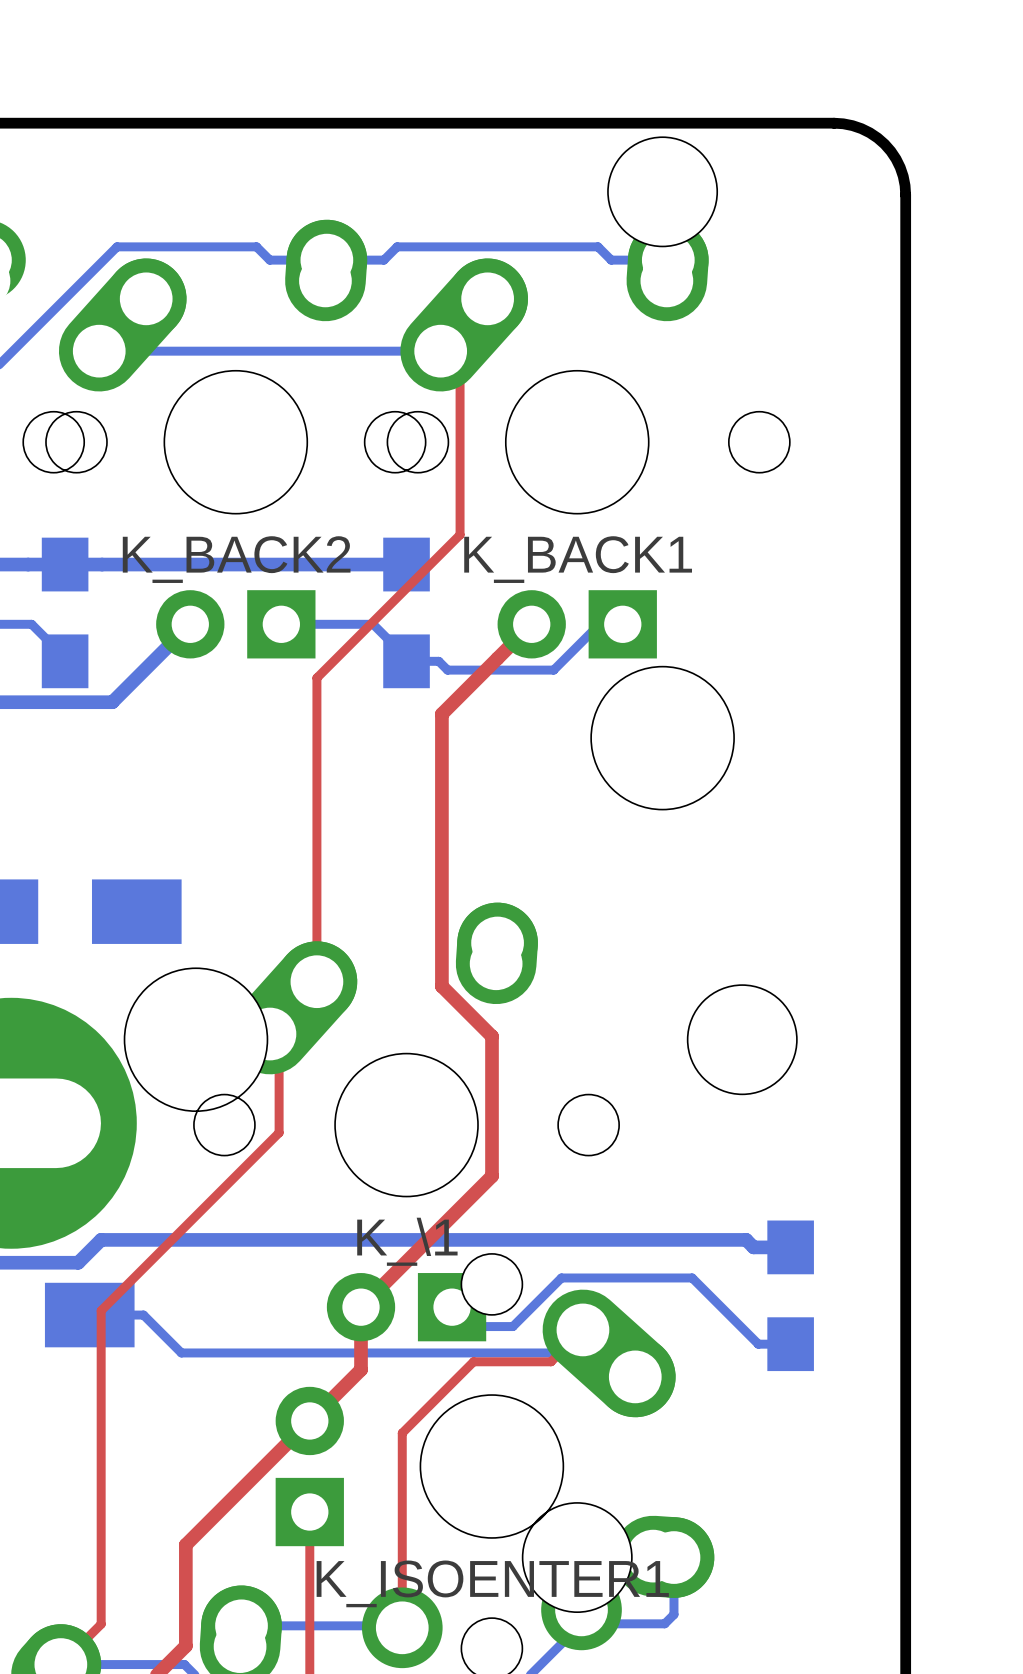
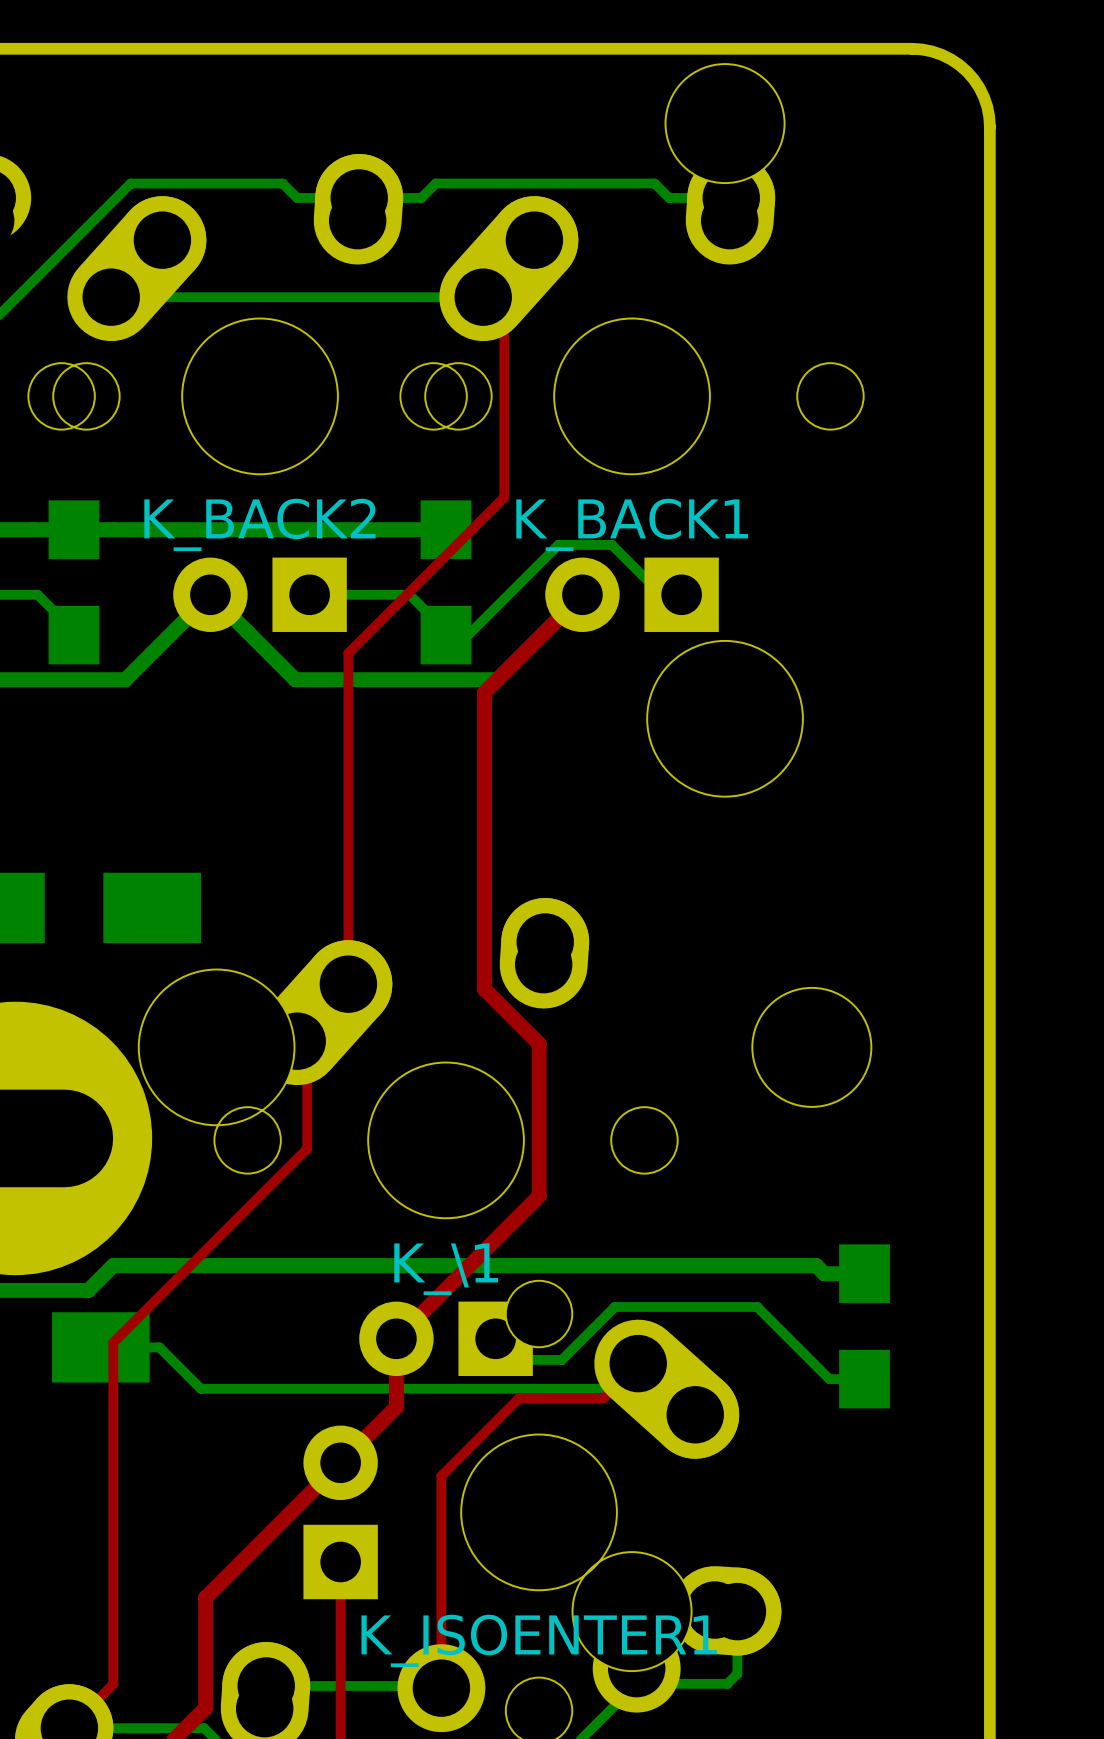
bottom track: none -> (210, 594) (295, 679) (497, 679) (582, 594)
bottom track: (599, 624) (553, 670) (447, 670) (438, 661) (426, 661) -> (661, 594) (611, 544) (558, 544) (468, 635)

